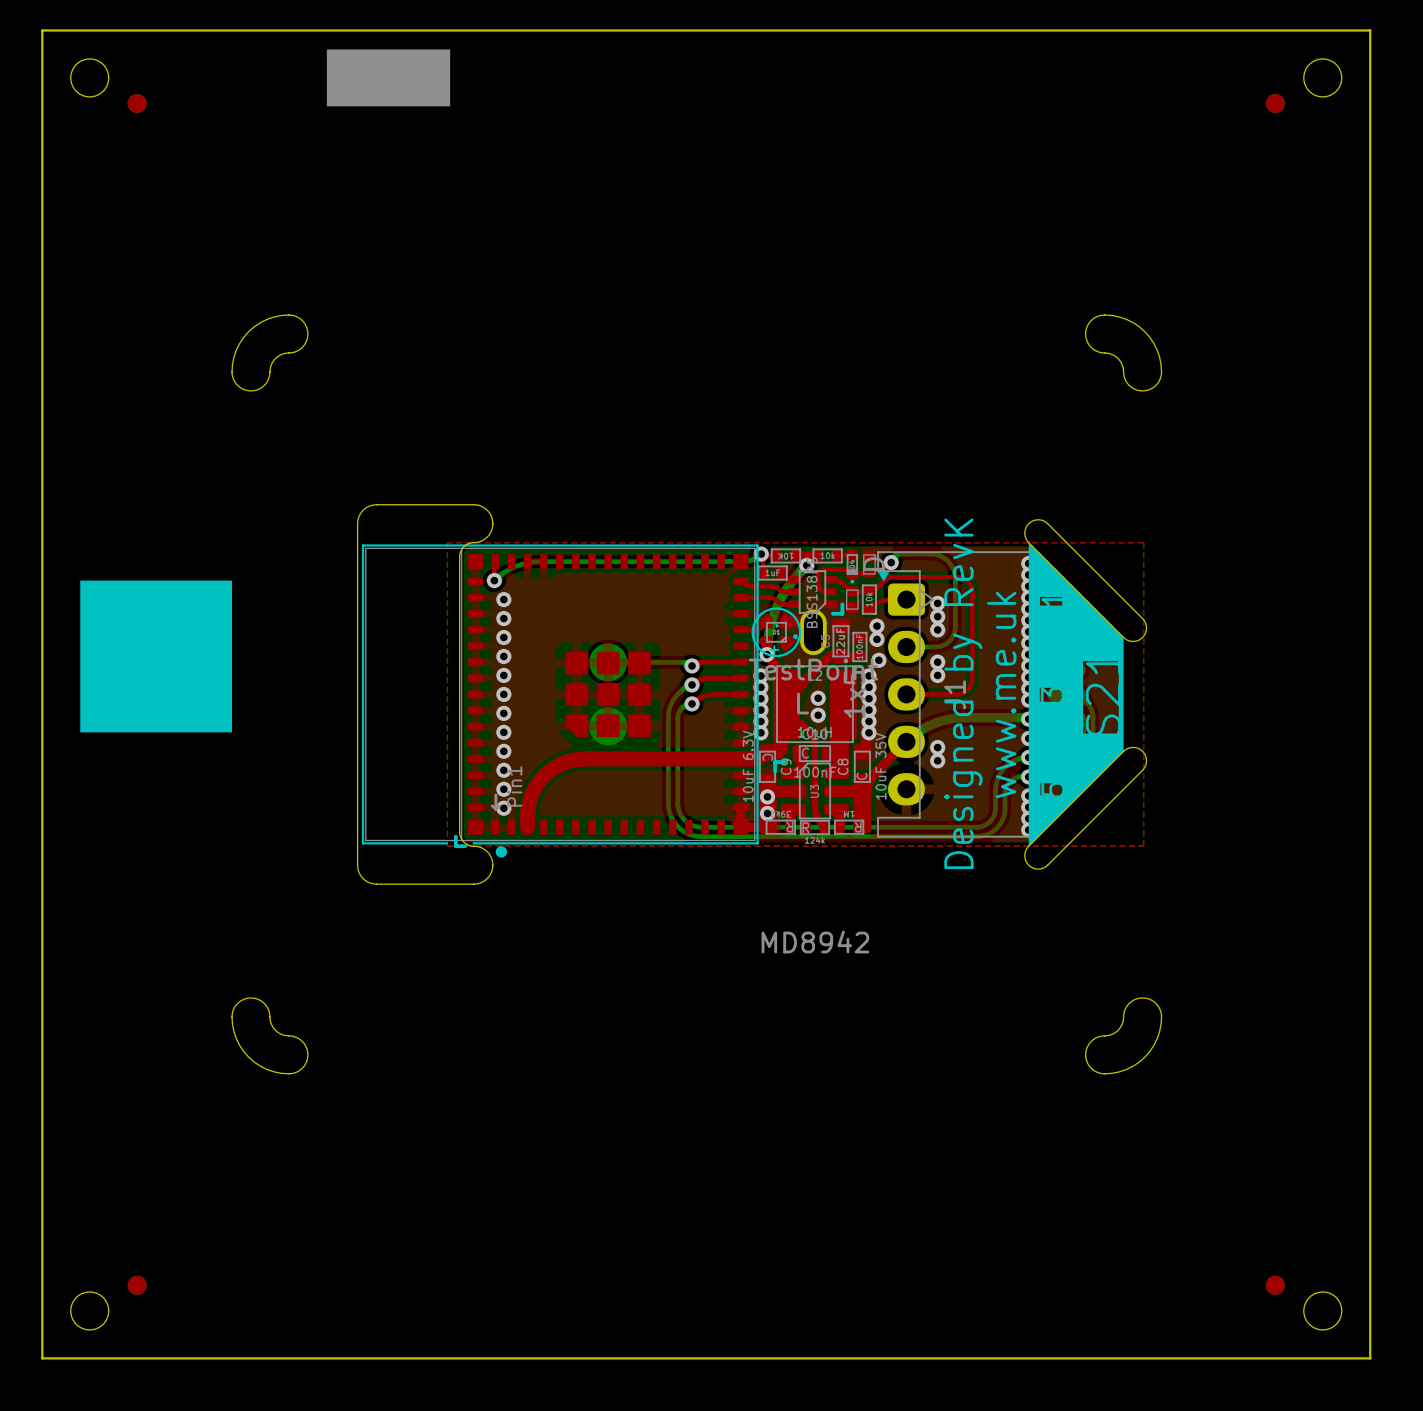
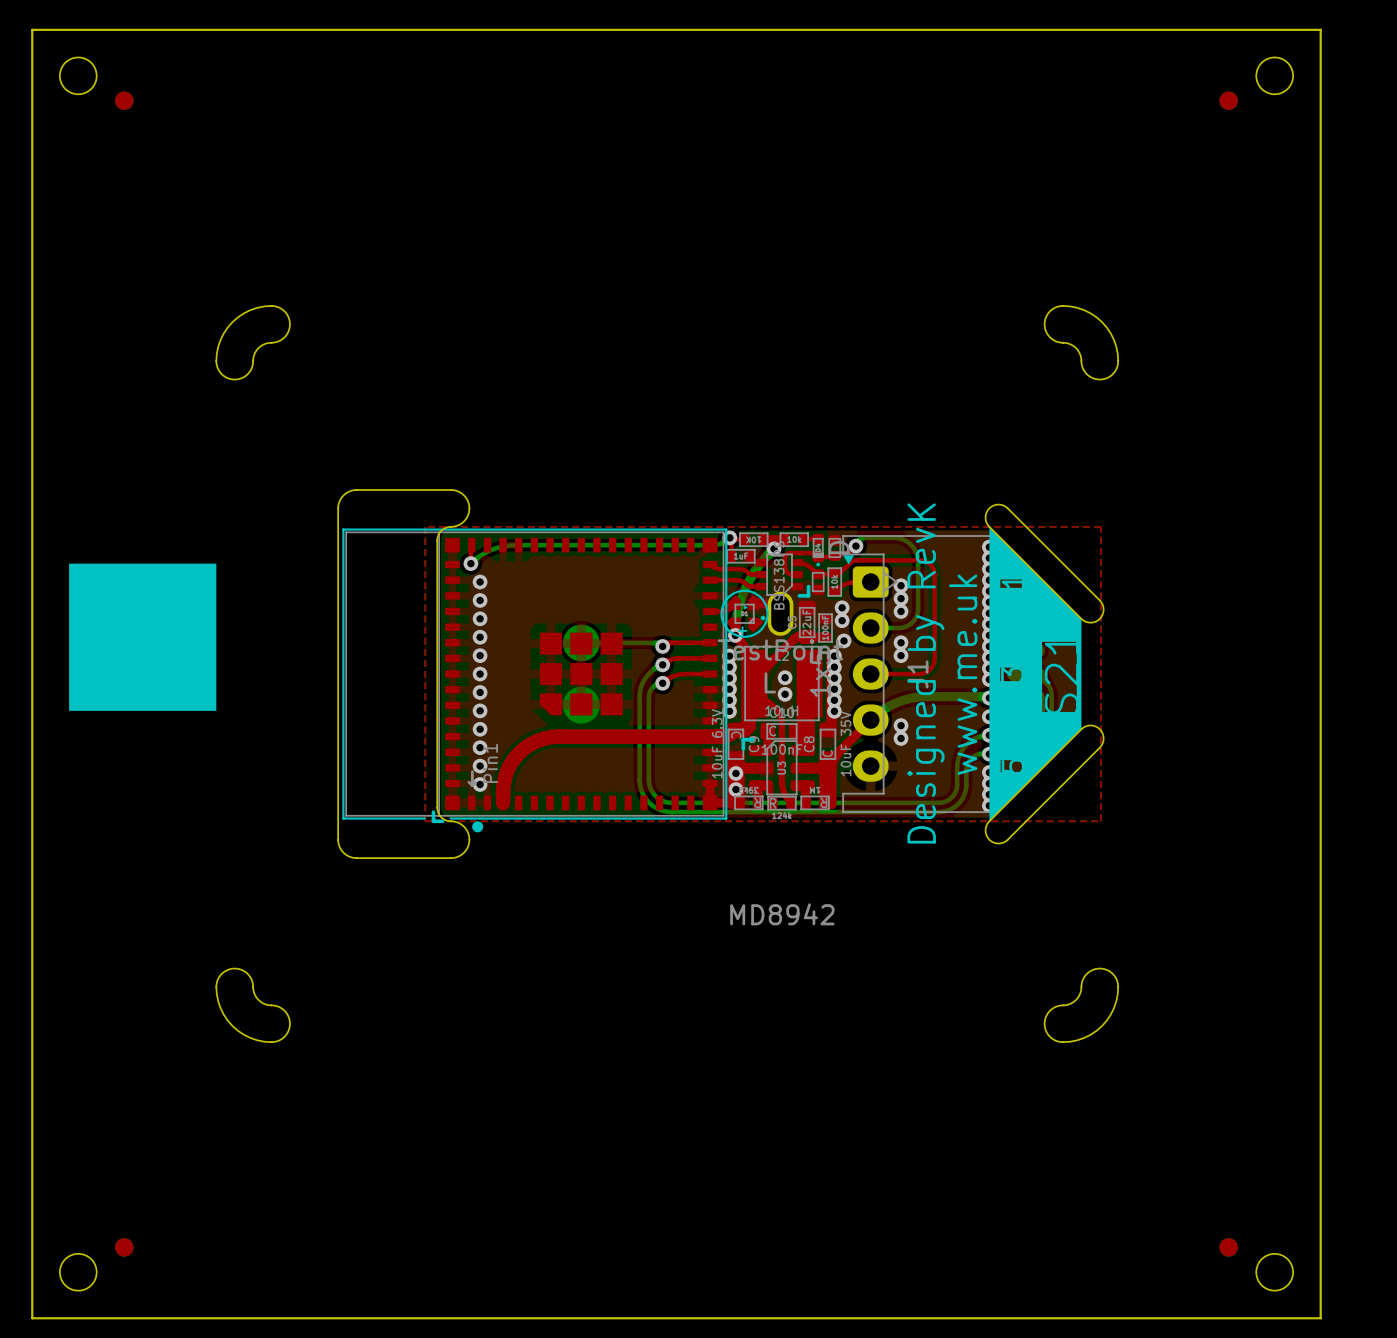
part footprint: [41, 29, 1372, 1360] -> [31, 28, 1322, 1320]

